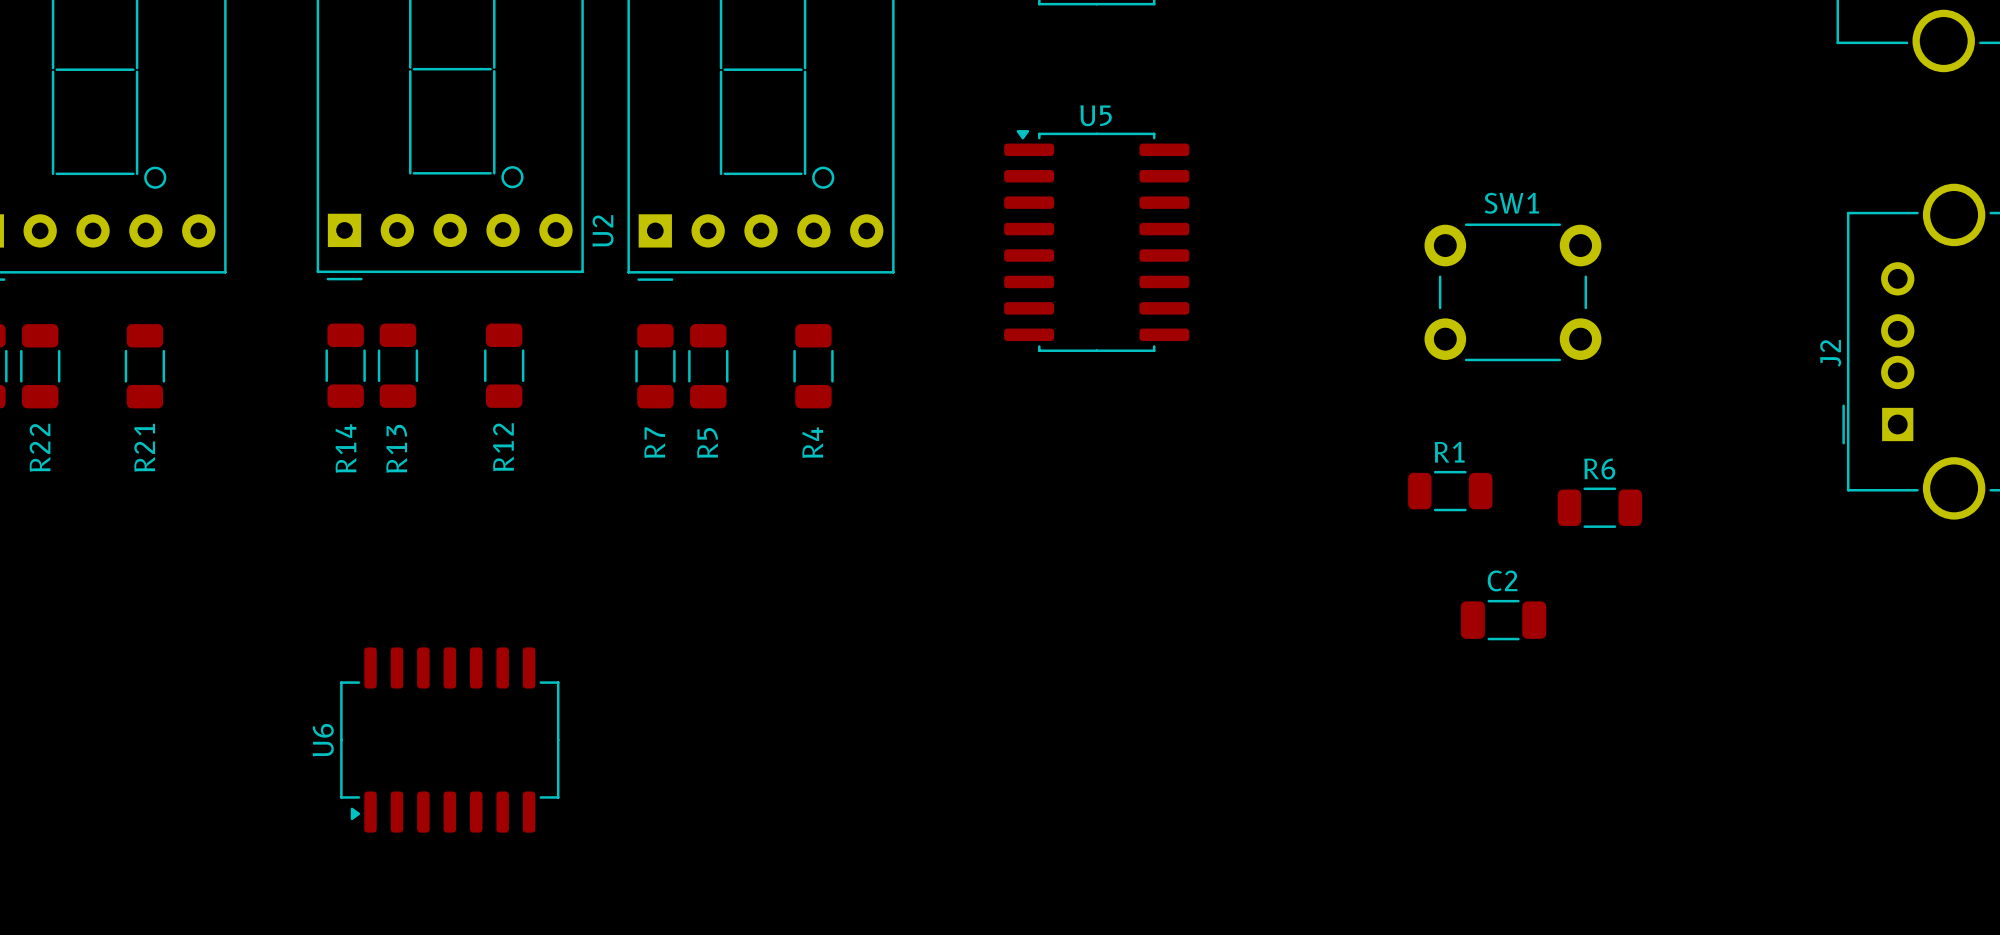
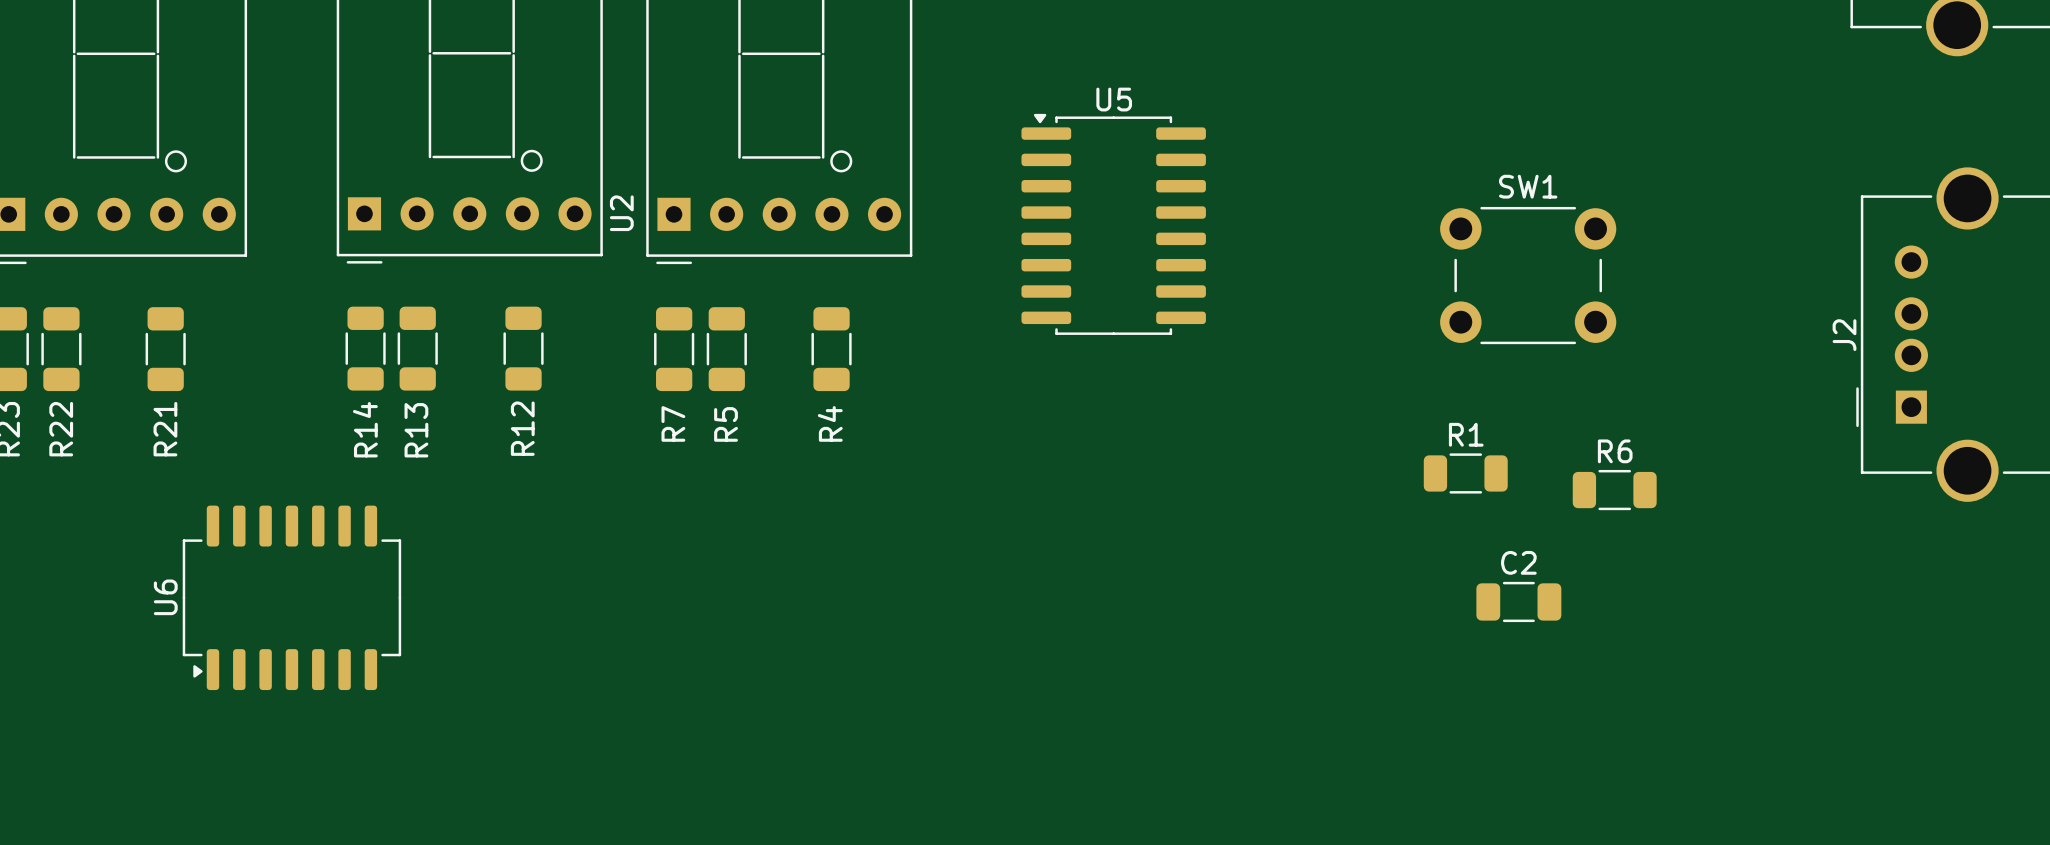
U6 position: (449, 740) -> (291, 597)

